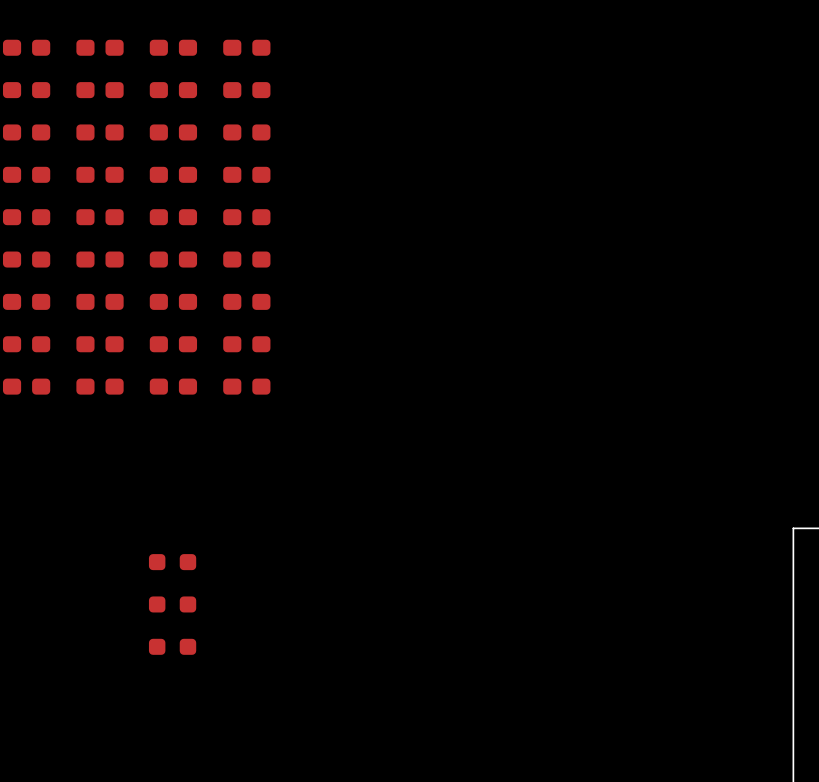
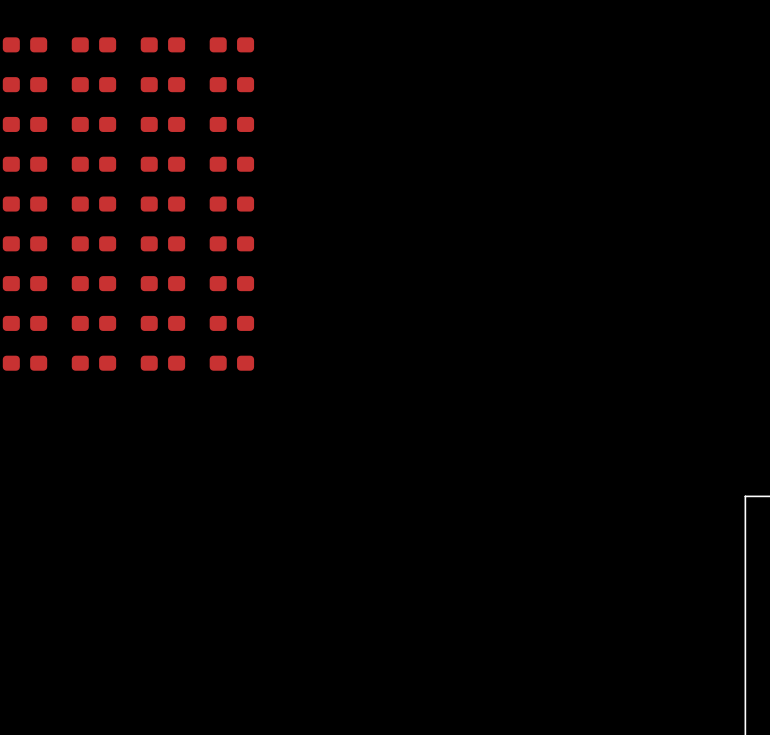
part: (172, 562) -> none
part: (172, 604) -> none
part: (172, 646) -> none

